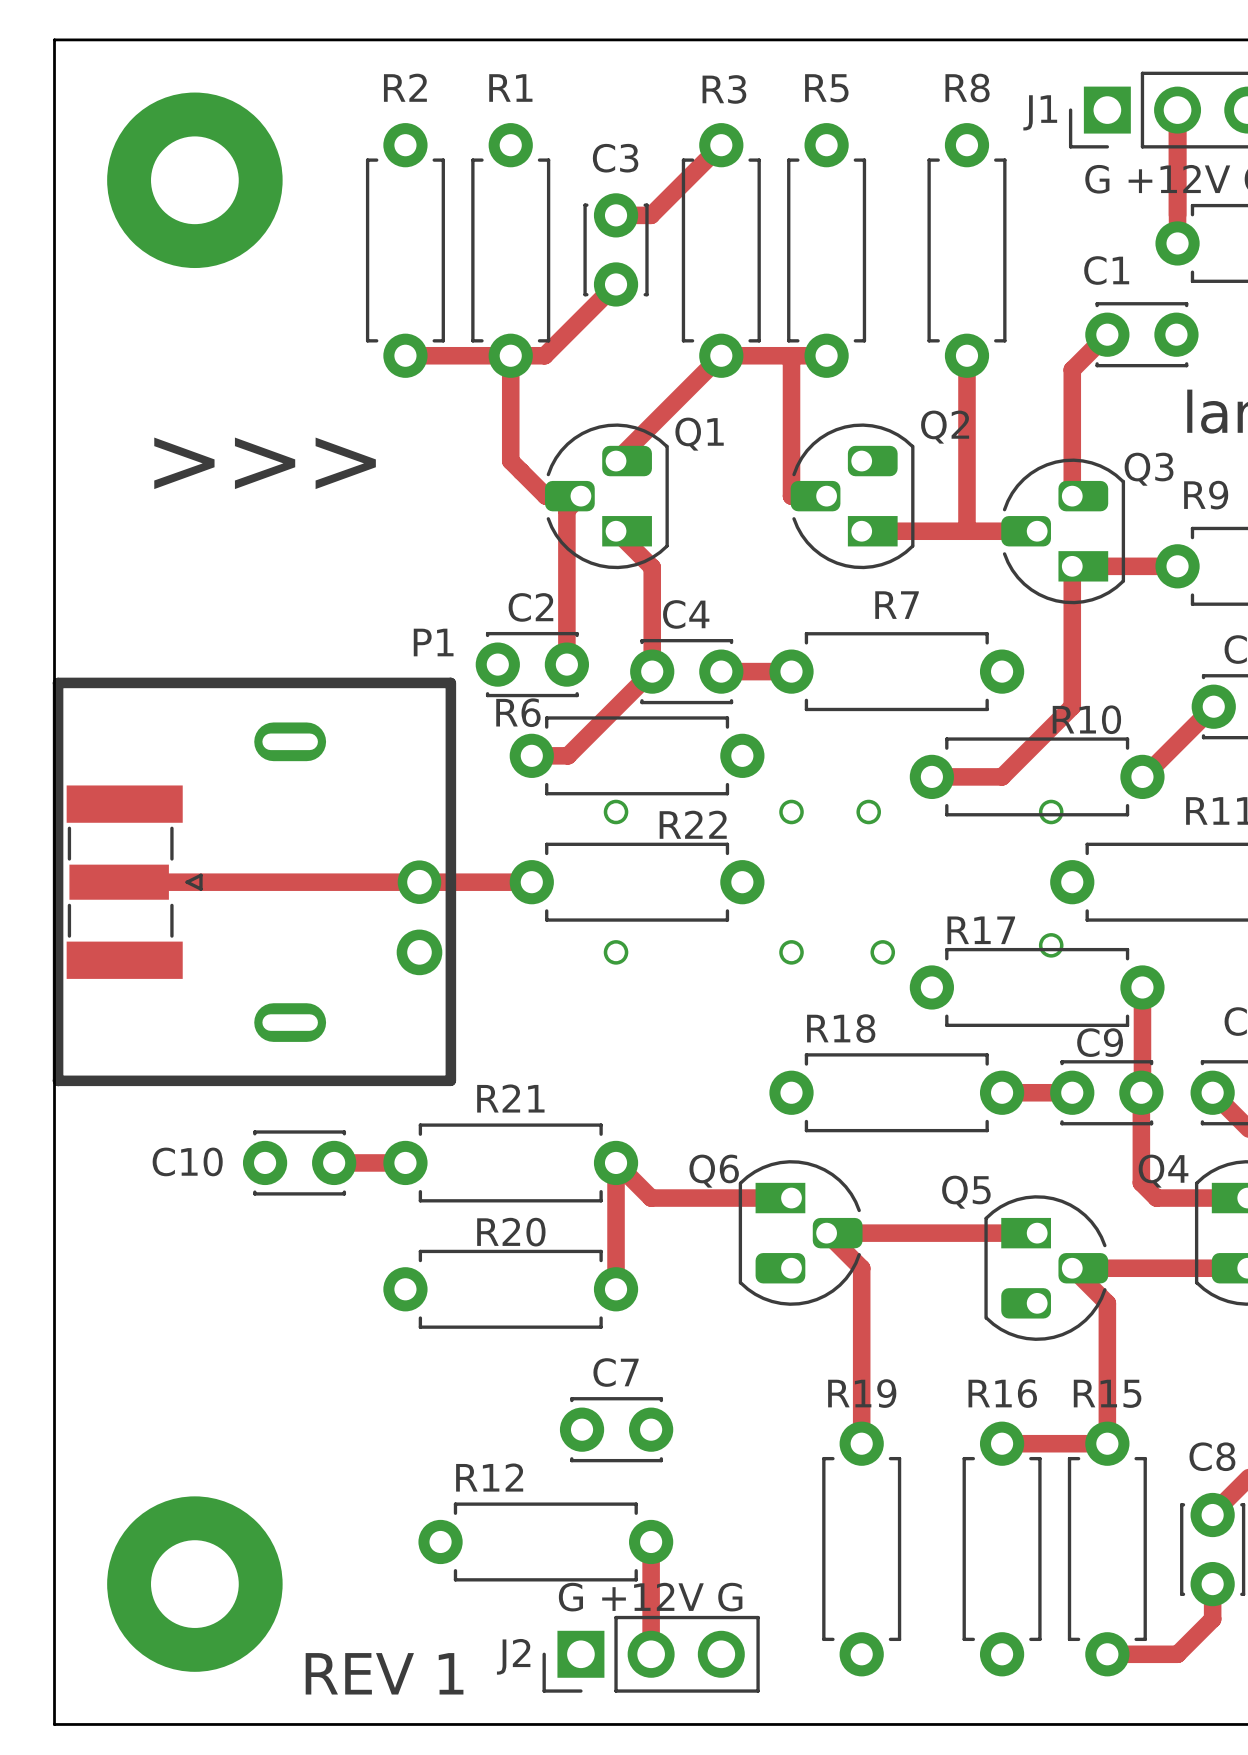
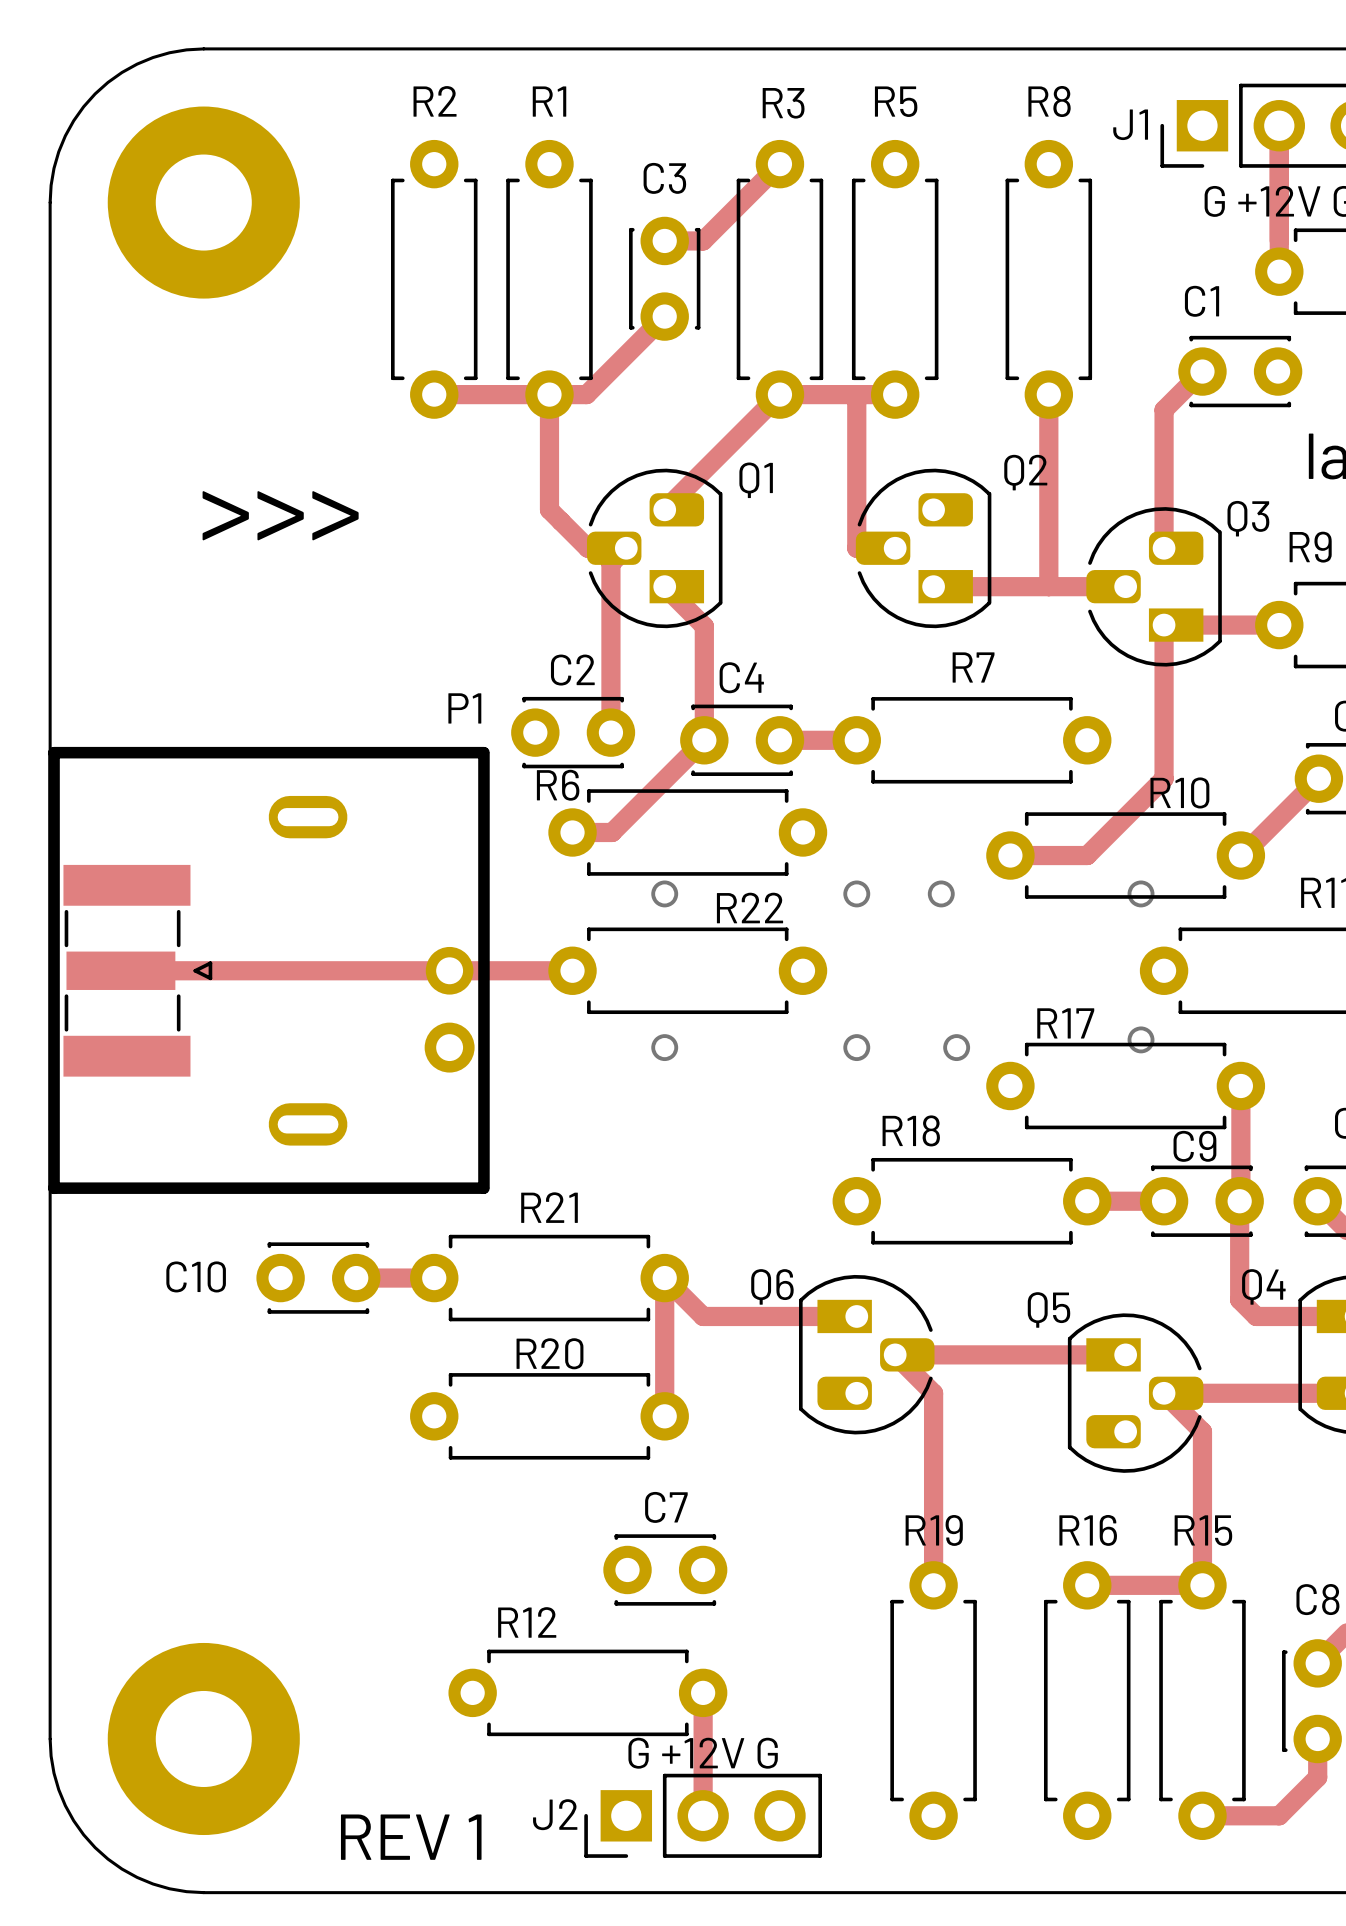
board edge: (194, 39) (54, 39) (54, 180) -> (203, 48) (169, 52) (137, 64) (107, 82) (95, 93) (73, 120) (65, 135) (53, 168) (50, 202)
board edge: (54, 1584) (54, 1724) (194, 1724) -> (50, 1738) (53, 1773) (65, 1805) (83, 1834) (95, 1847) (107, 1859) (137, 1877) (169, 1888) (203, 1892)

